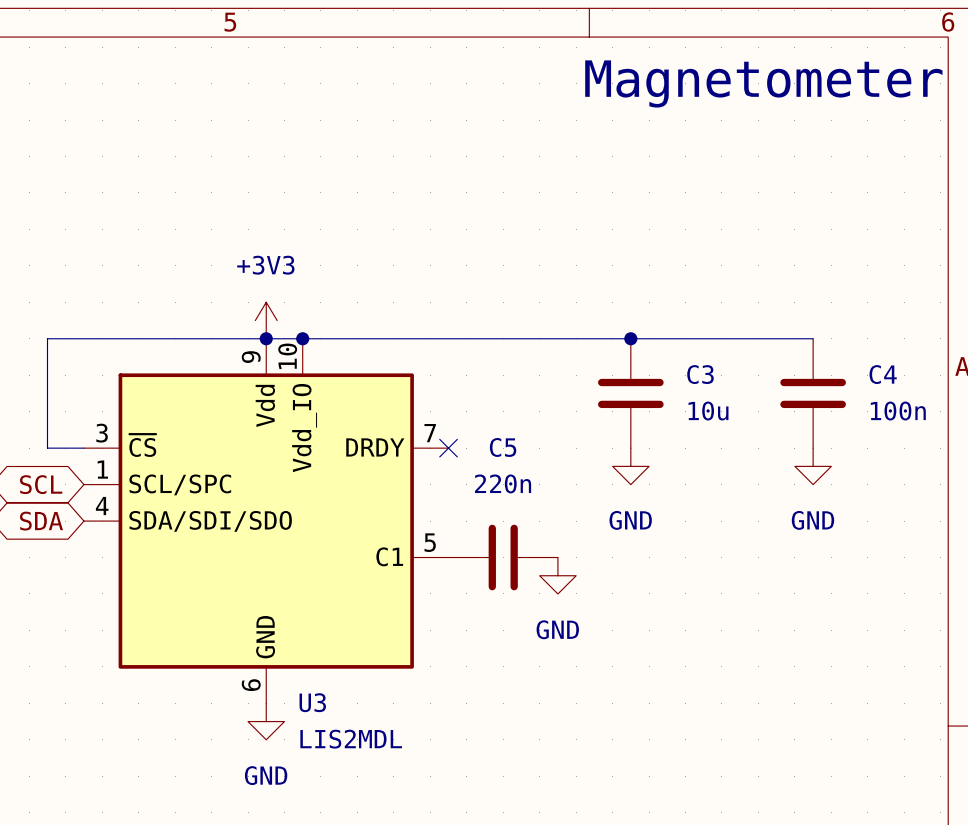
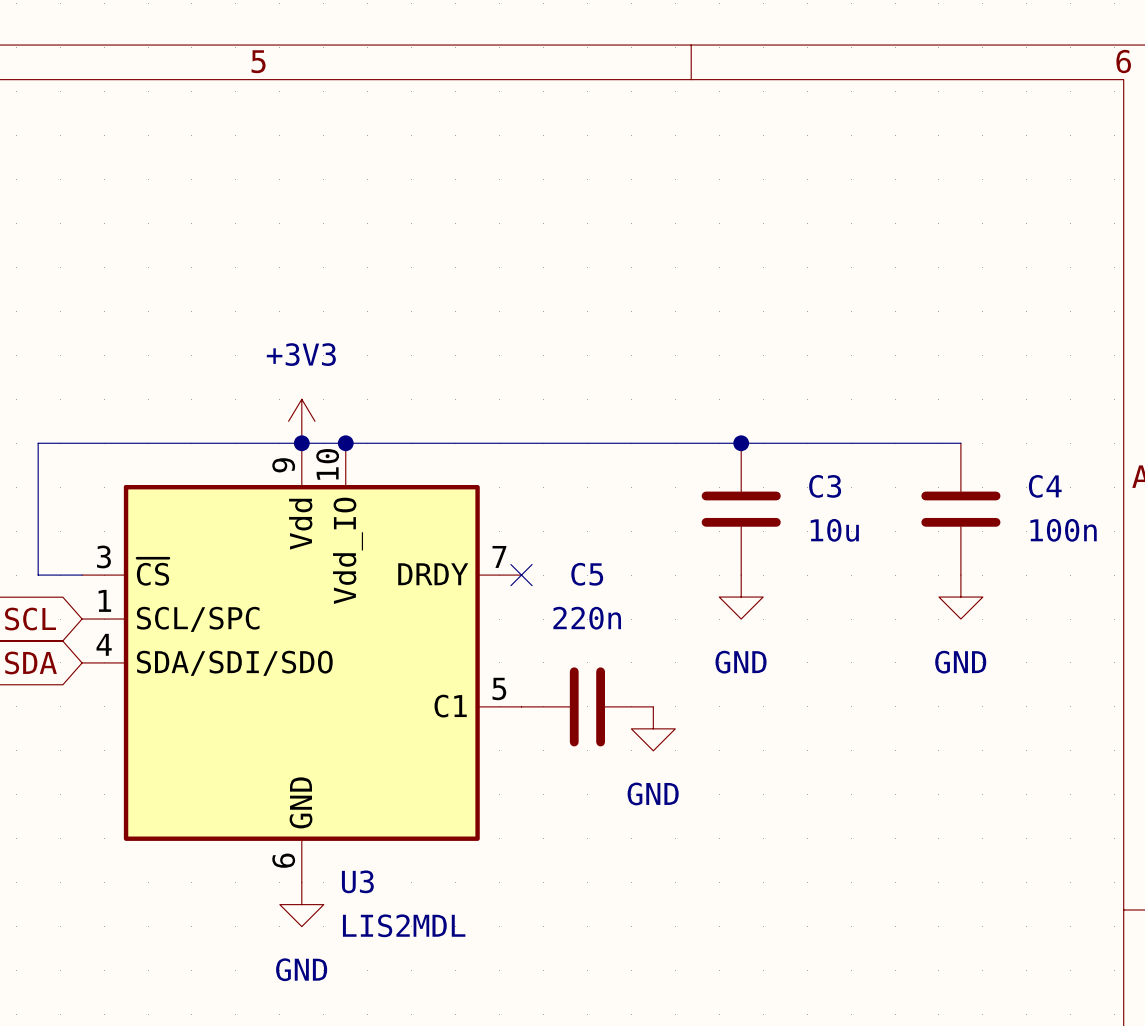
text: Magnetometer (763, 83) -> none

